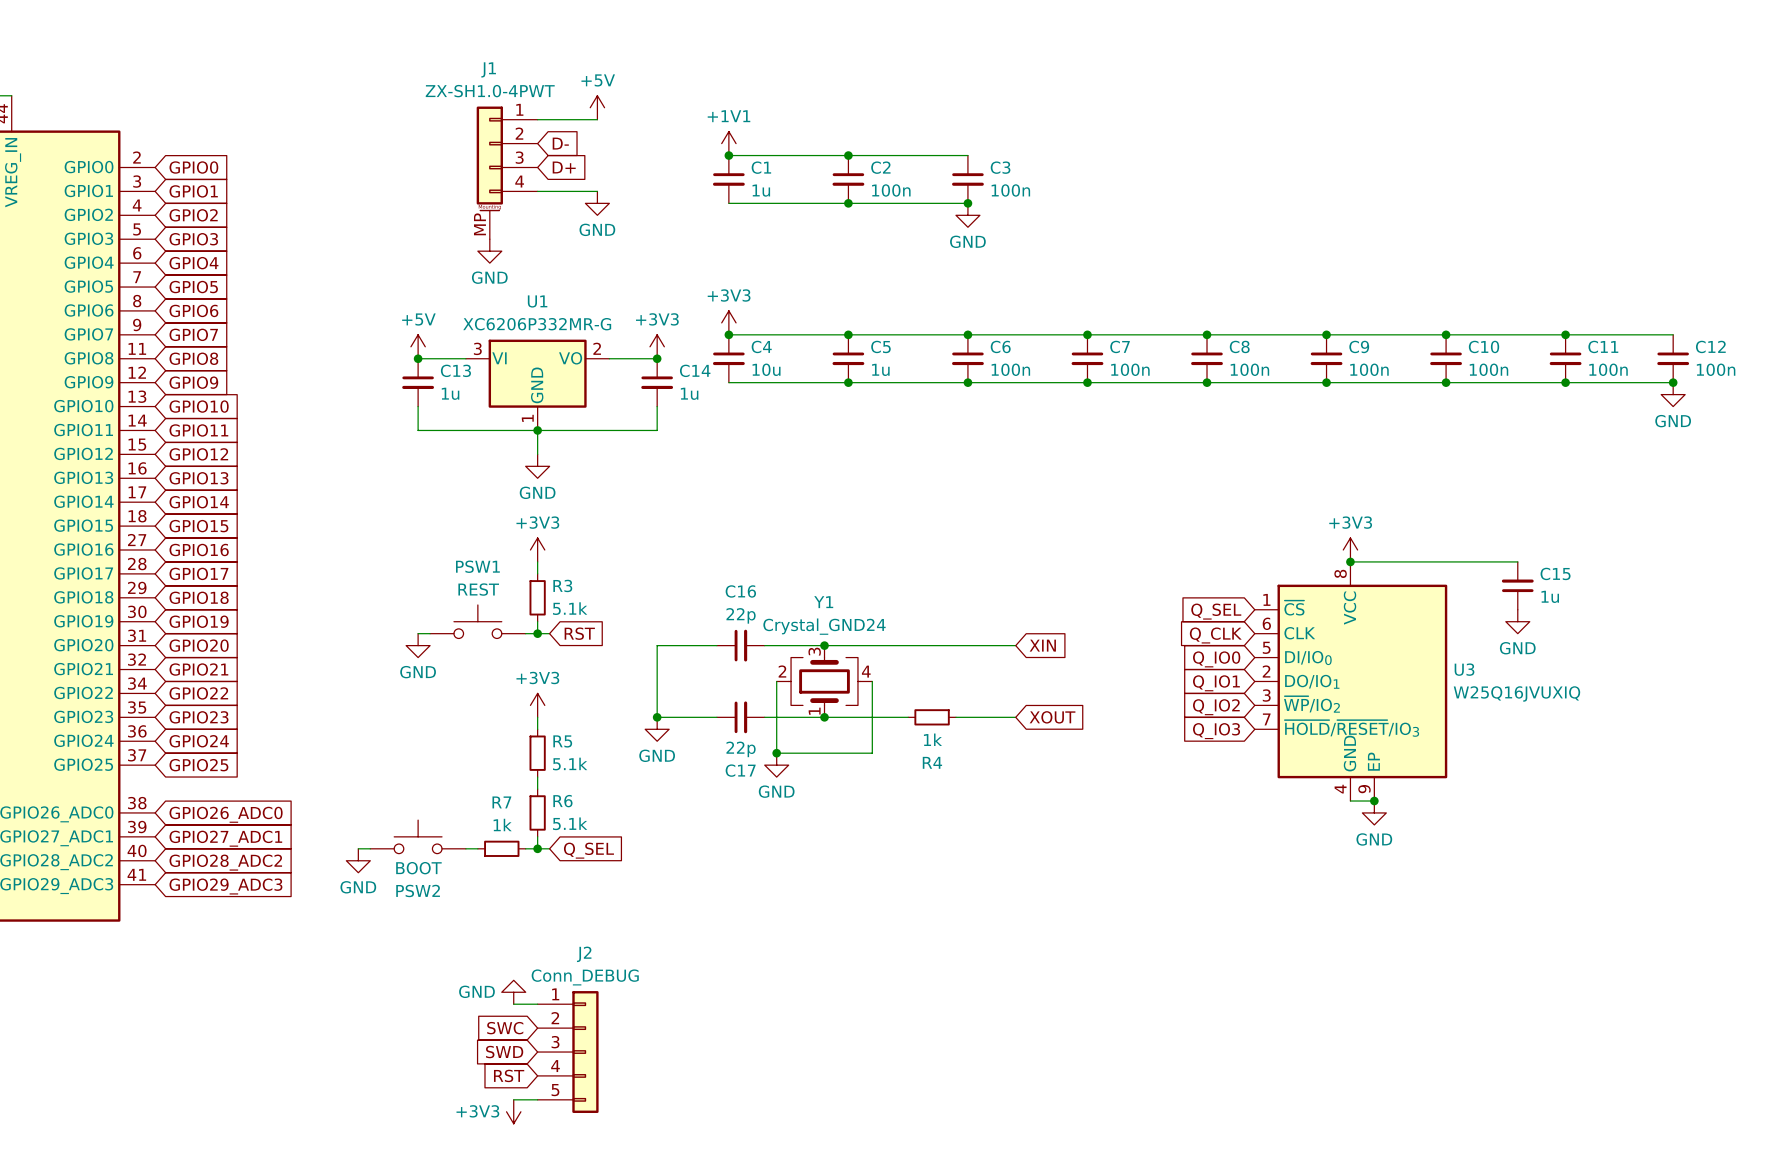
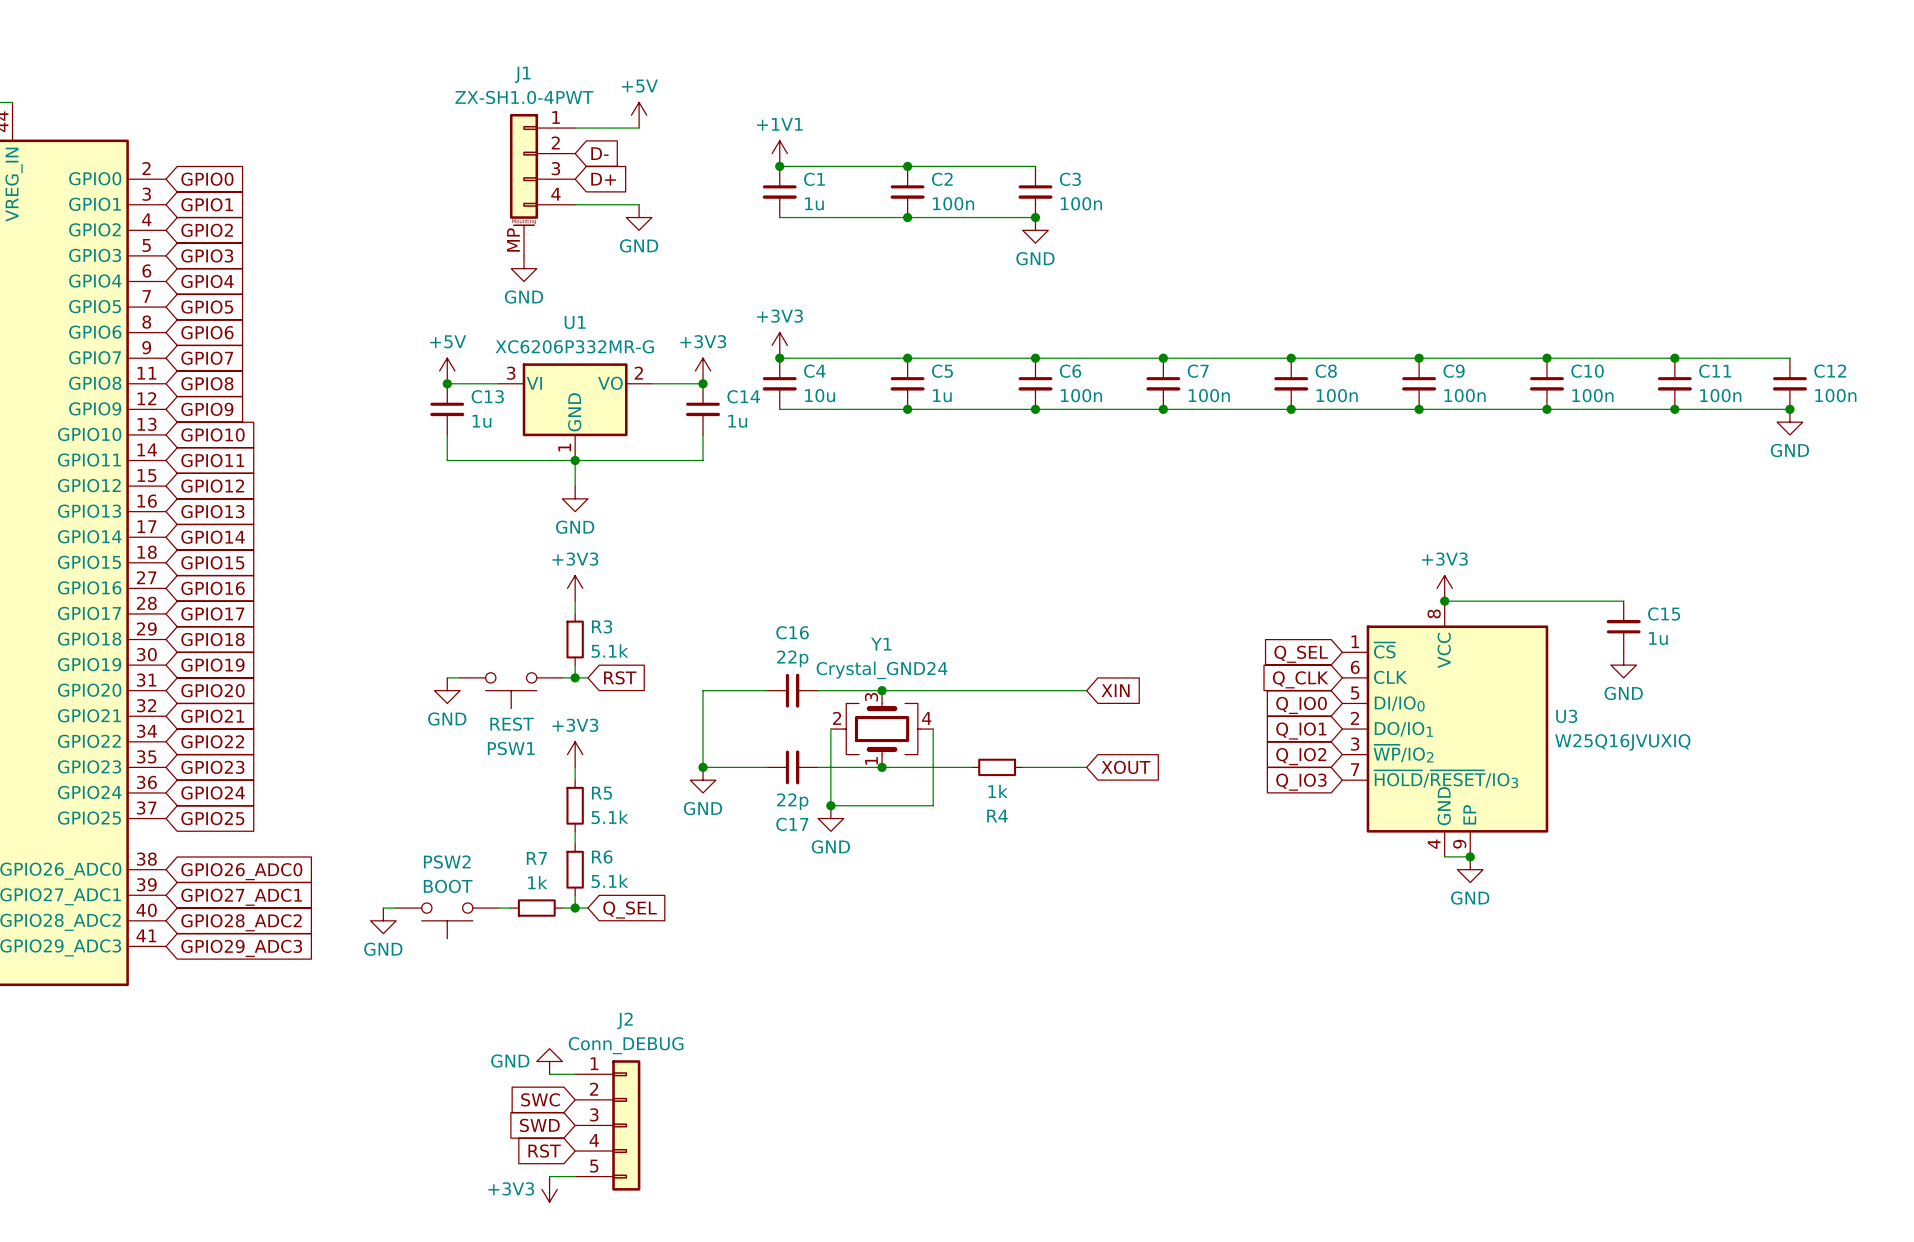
PSW1 rotation: 0° (477, 621) -> 180° (511, 690)
PSW2 rotation: 0° (418, 836) -> 180° (447, 920)

